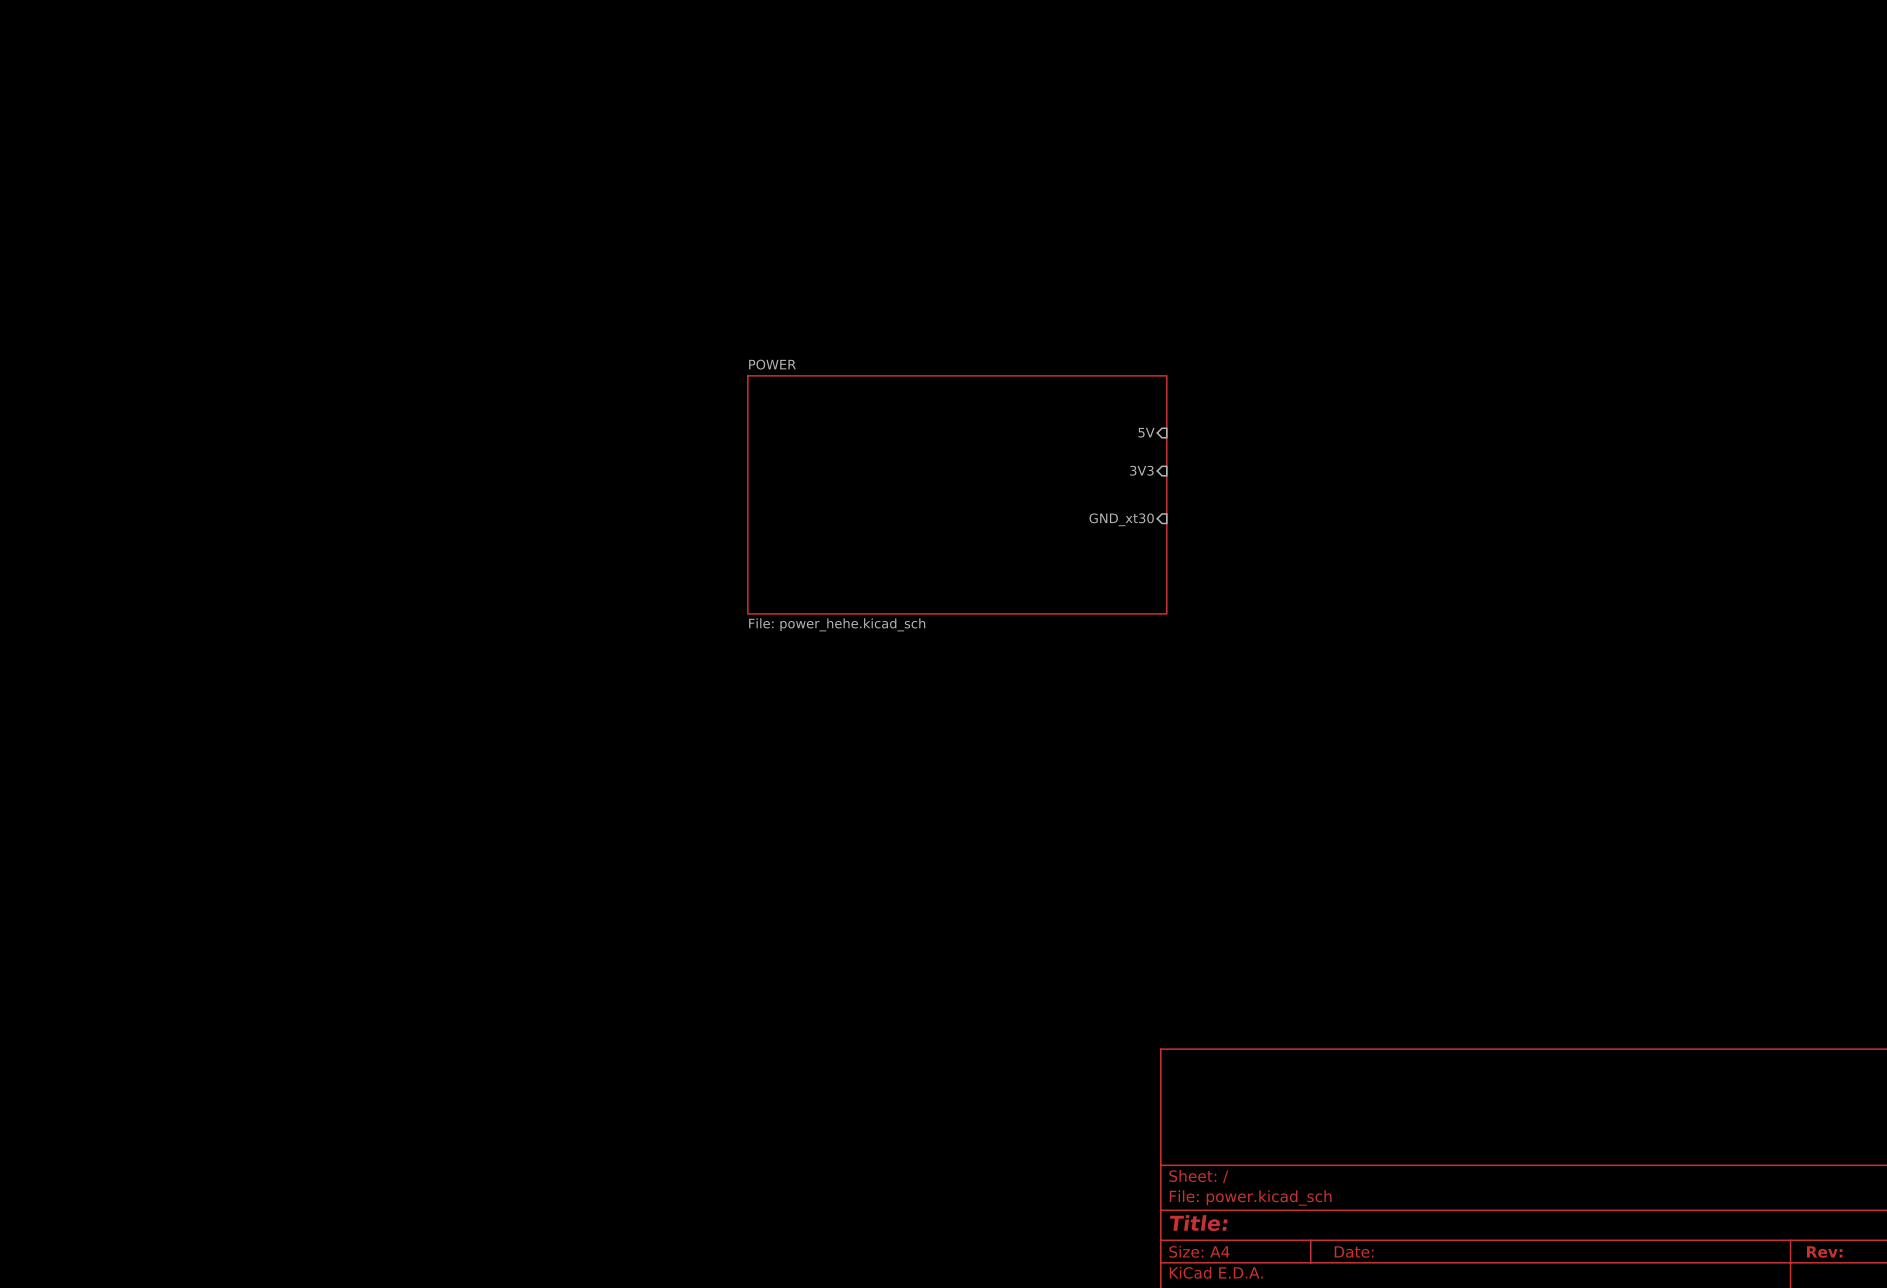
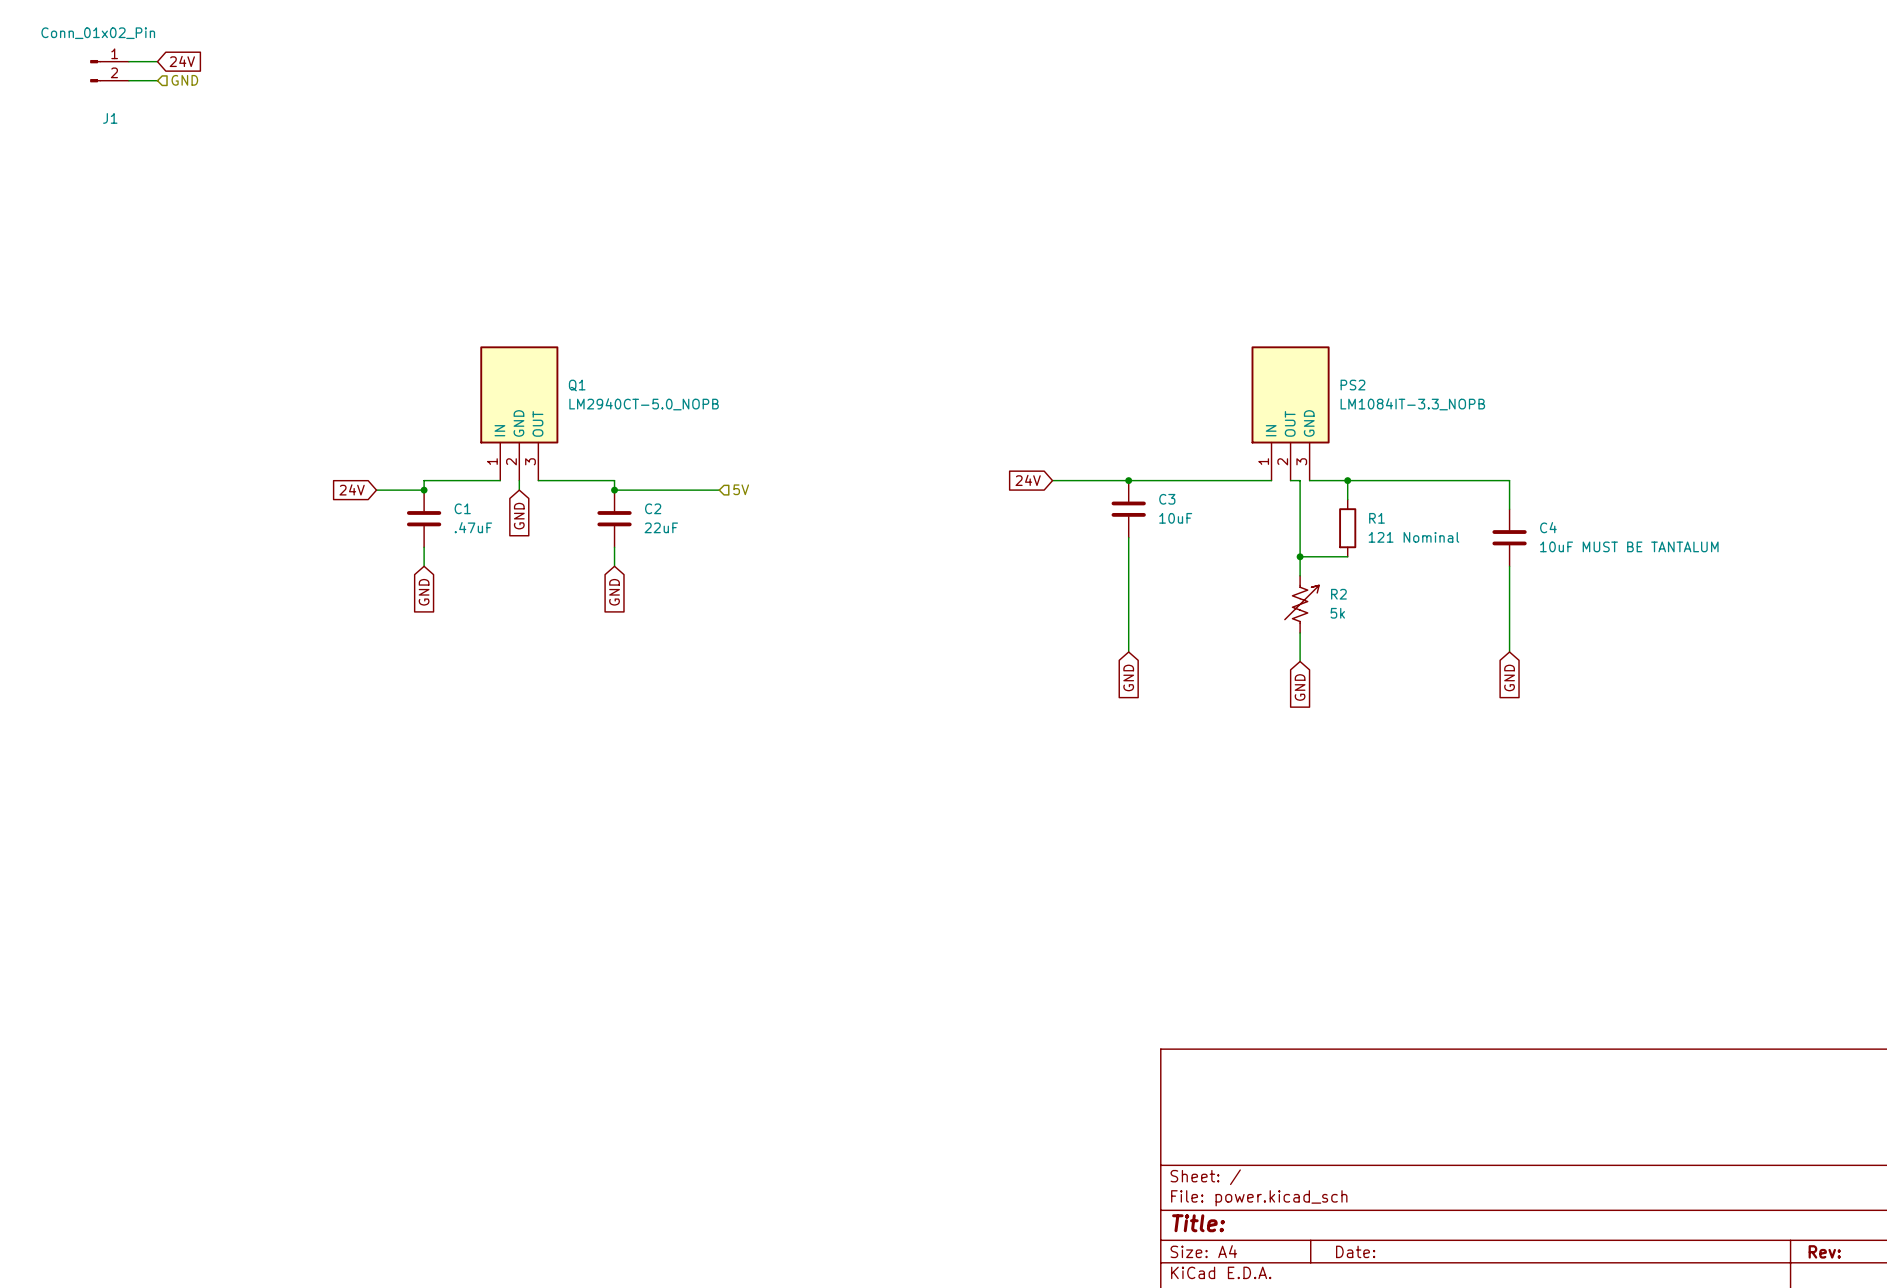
wire: none -> (128, 61) (157, 61)
global label: none -> 24V (182, 61)
J1: none -> Conn_01x02_Pin (109, 71)
wire: none -> (128, 80) (157, 80)
hierarchical label: none -> GND (184, 80)
Q1: none -> LM2940CT-5.0_NOPB (519, 413)
PS2: none -> LM1084IT-3.3_NOPB (1290, 413)
sheet pin: 5V (1146, 432) -> none
sheet pin: 3V3 (1141, 470) -> none
wire: none -> (500, 480) (424, 480) (424, 490) (376, 490)
wire: none -> (519, 480) (519, 490)
wire: none -> (538, 480) (614, 480) (614, 490) (719, 490)
global label: none -> 24V (1028, 480)
wire: none -> (1052, 480) (1271, 480)
junction: none -> (1128, 480)
wire: none -> (1290, 480) (1300, 480) (1300, 575)
wire: none -> (1309, 480) (1509, 480) (1509, 509)
wire: none -> (1347, 480) (1347, 499)
junction: none -> (1347, 480)
hierarchical label: none -> 5V (741, 489)
global label: none -> 24V (352, 489)
junction: none -> (424, 490)
junction: none -> (614, 490)
sheet POWER: File: power_hehe.kicad_sch (957, 494) -> none
C3: none -> 10uF (1128, 509)
global label: none -> GND (519, 516)
C1: none -> .47uF (424, 518)
C2: none -> 22uF (614, 518)
sheet pin: GND_xt30 (1121, 519) -> none
R1: none -> 121 Nominal (1347, 528)
wire: none -> (1128, 537) (1128, 652)
C4: none -> 10uF MUST BE TANTALUM (1509, 537)
wire: none -> (424, 547) (424, 566)
wire: none -> (614, 547) (614, 566)
wire: none -> (1300, 556) (1347, 556)
junction: none -> (1300, 556)
wire: none -> (1509, 566) (1509, 652)
global label: none -> GND (424, 592)
global label: none -> GND (614, 592)
R2: none -> 5k (1301, 604)
wire: none -> (1300, 632) (1300, 661)
global label: none -> GND (1128, 677)
global label: none -> GND (1509, 677)
global label: none -> GND (1300, 687)

